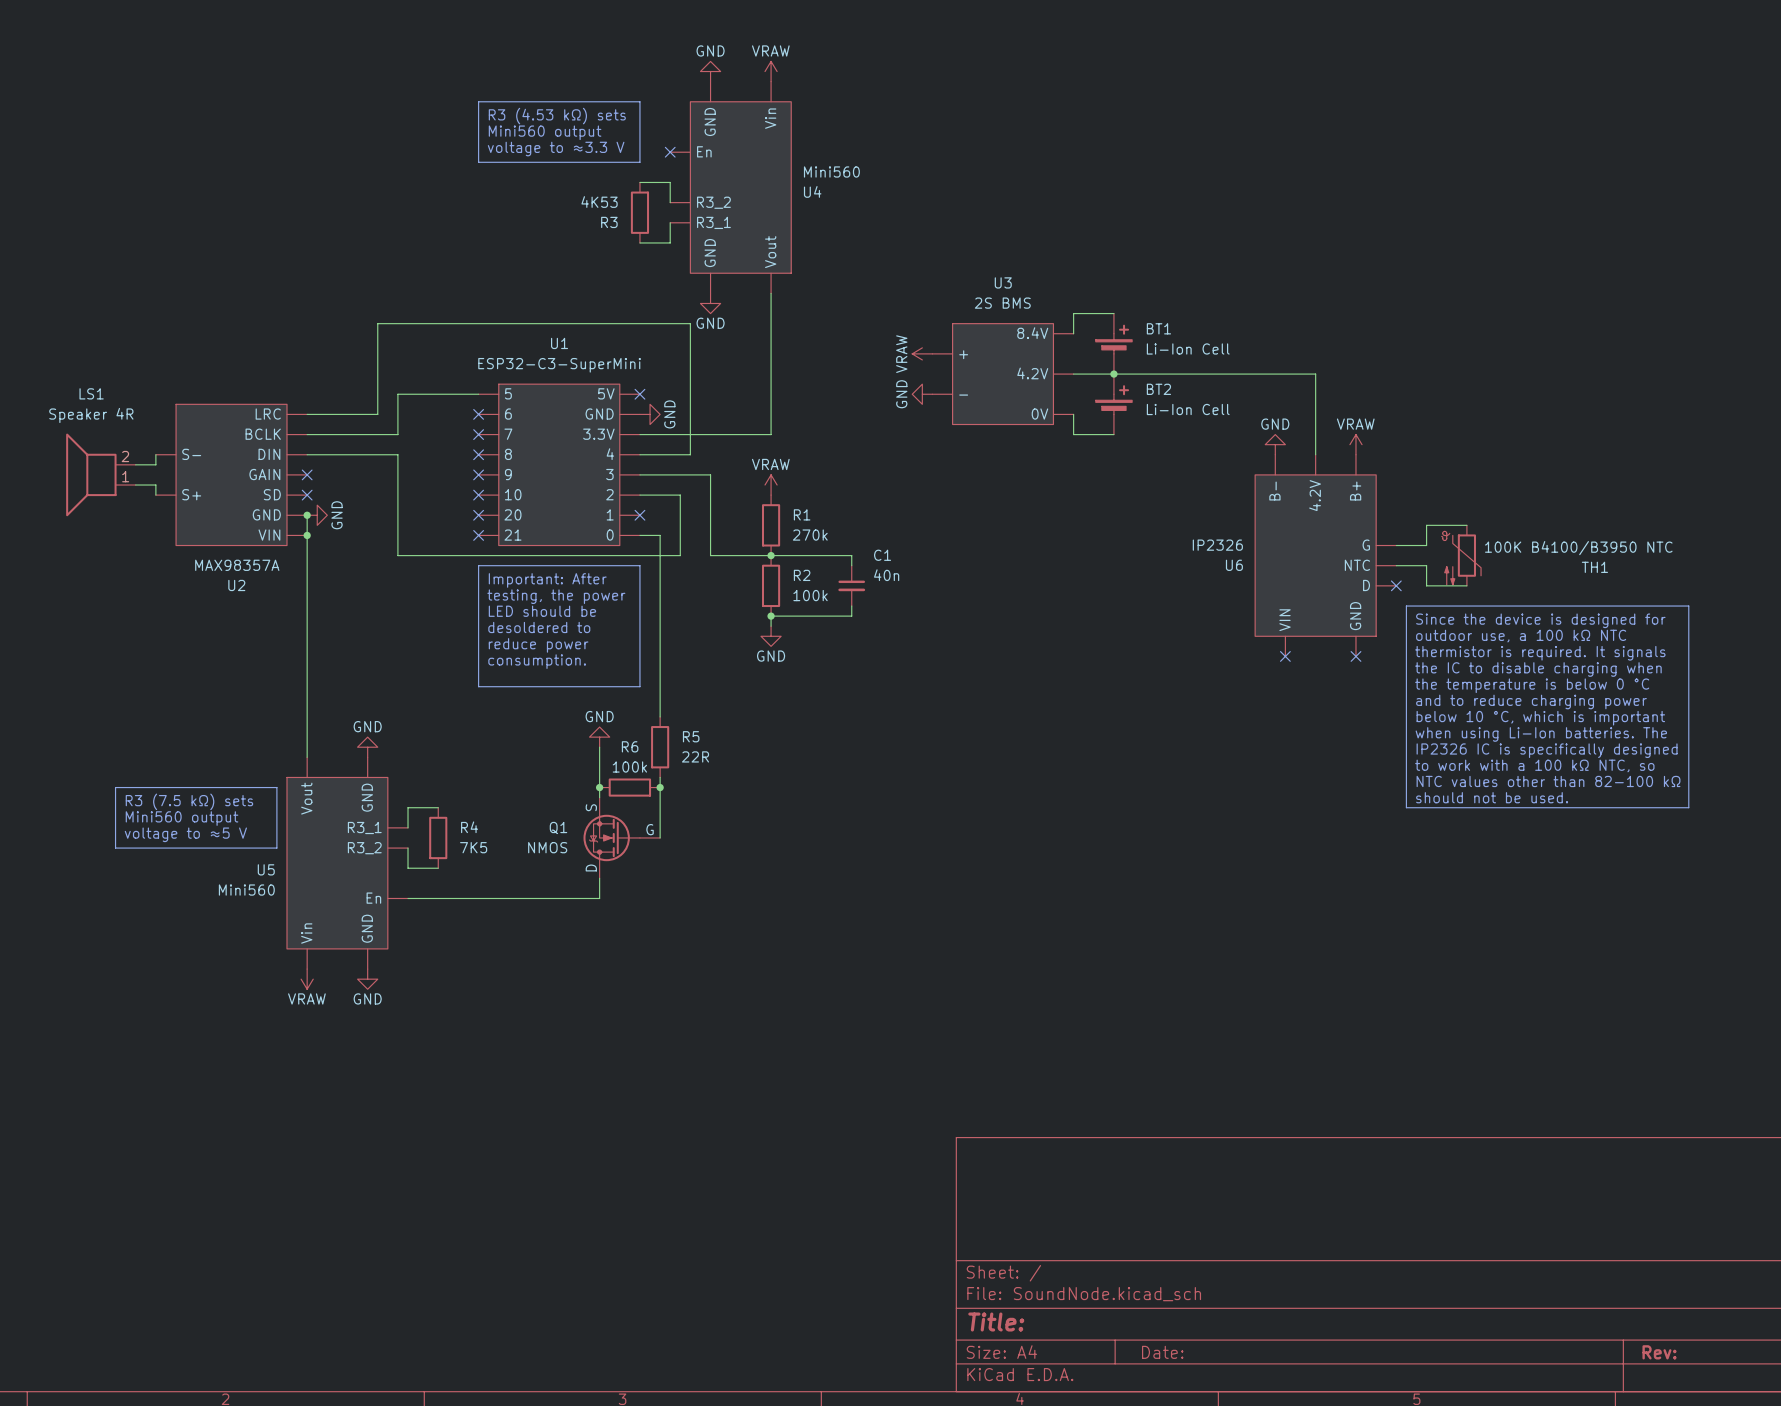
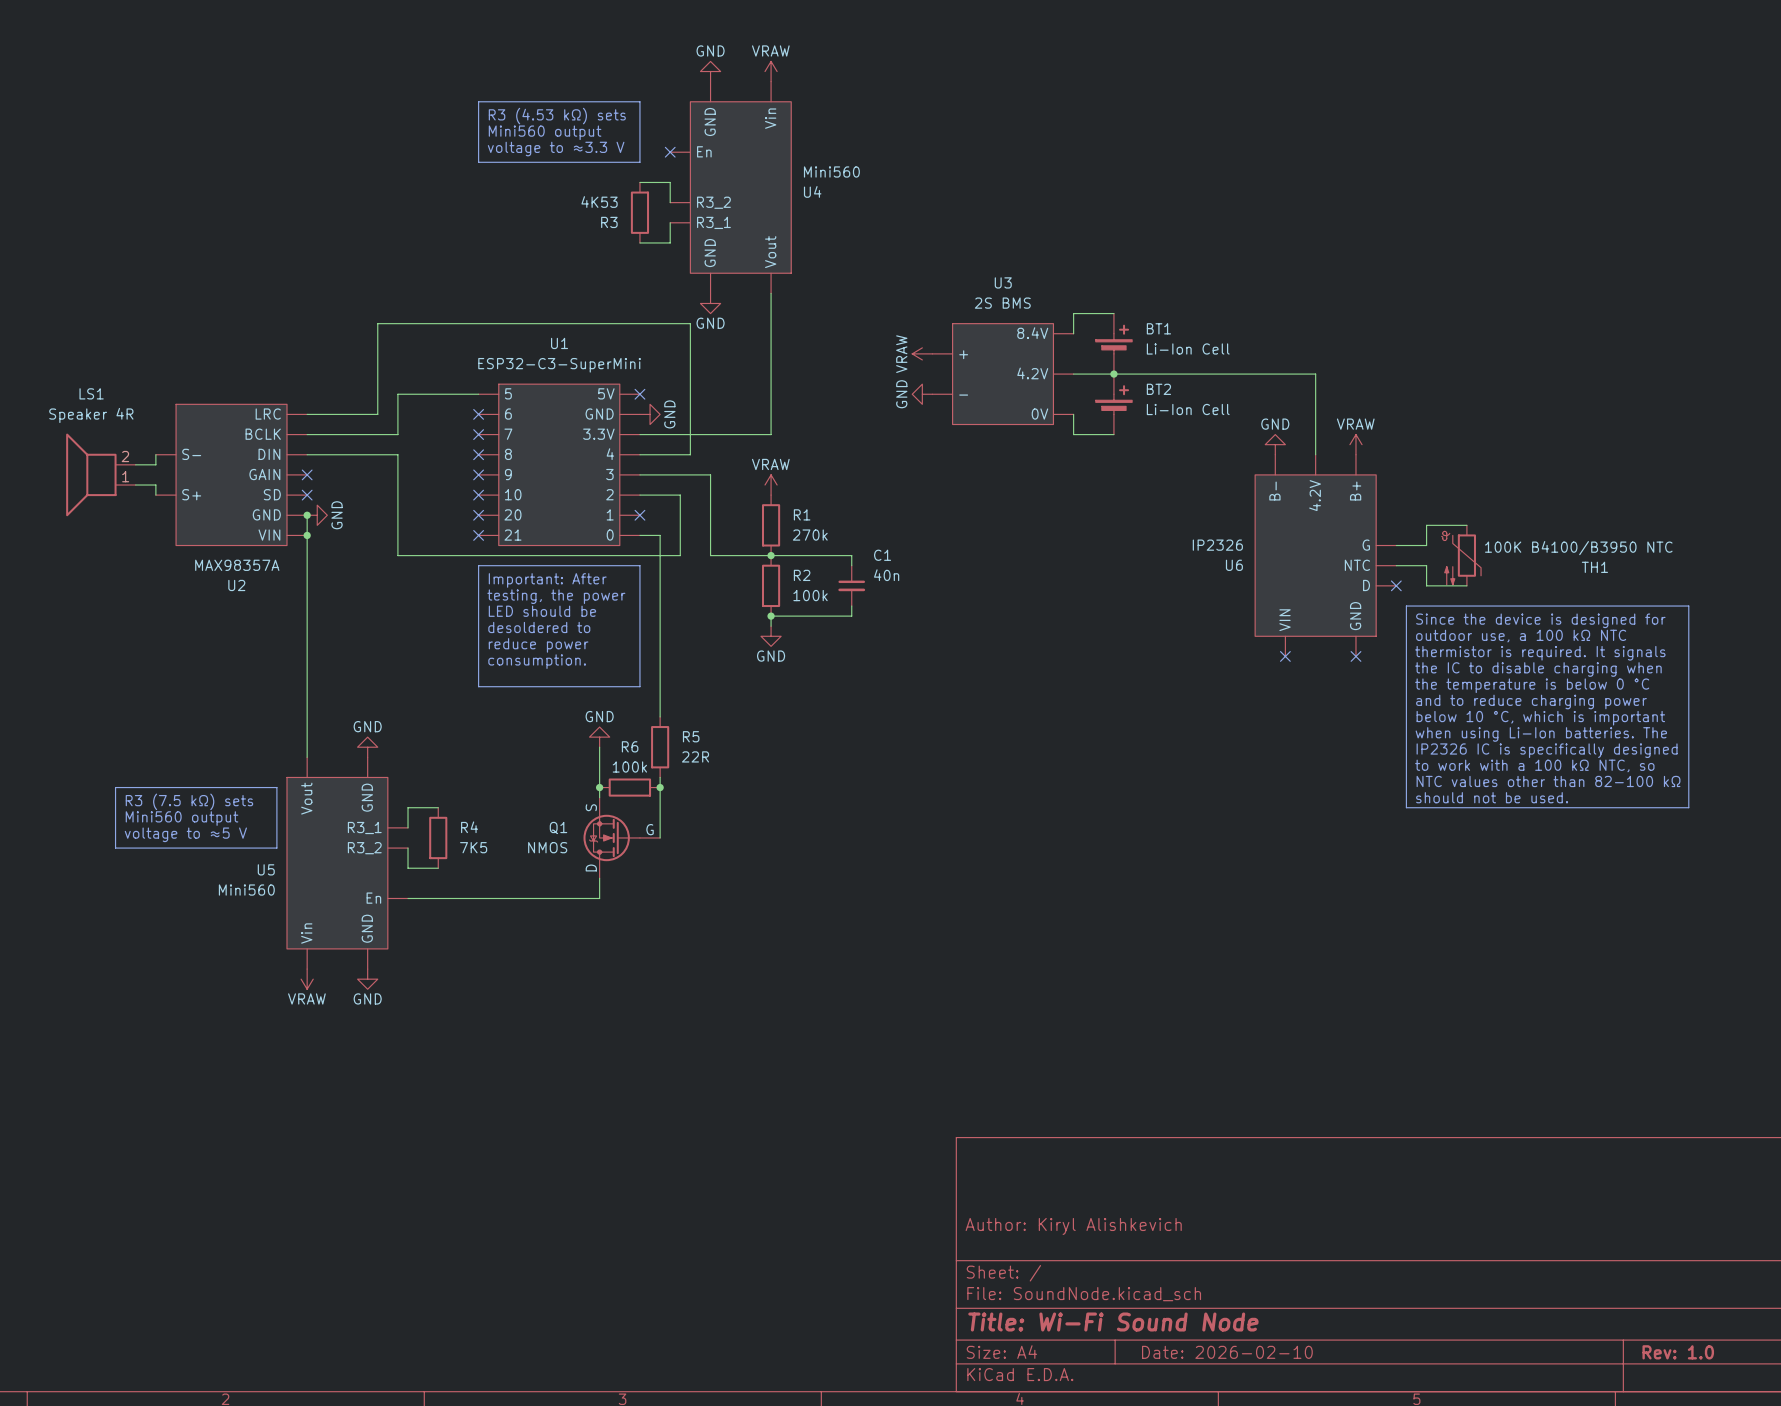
title block: none -> Author: Kiryl Alishkevich (1073, 1226)
title block: Title: (996, 1322) -> Title: Wi-Fi Sound Node (1113, 1322)
title block: Date: (1162, 1352) -> Date: 2026-02-10 (1227, 1352)
title block: Rev: (1659, 1352) -> Rev: 1.0 (1678, 1352)

